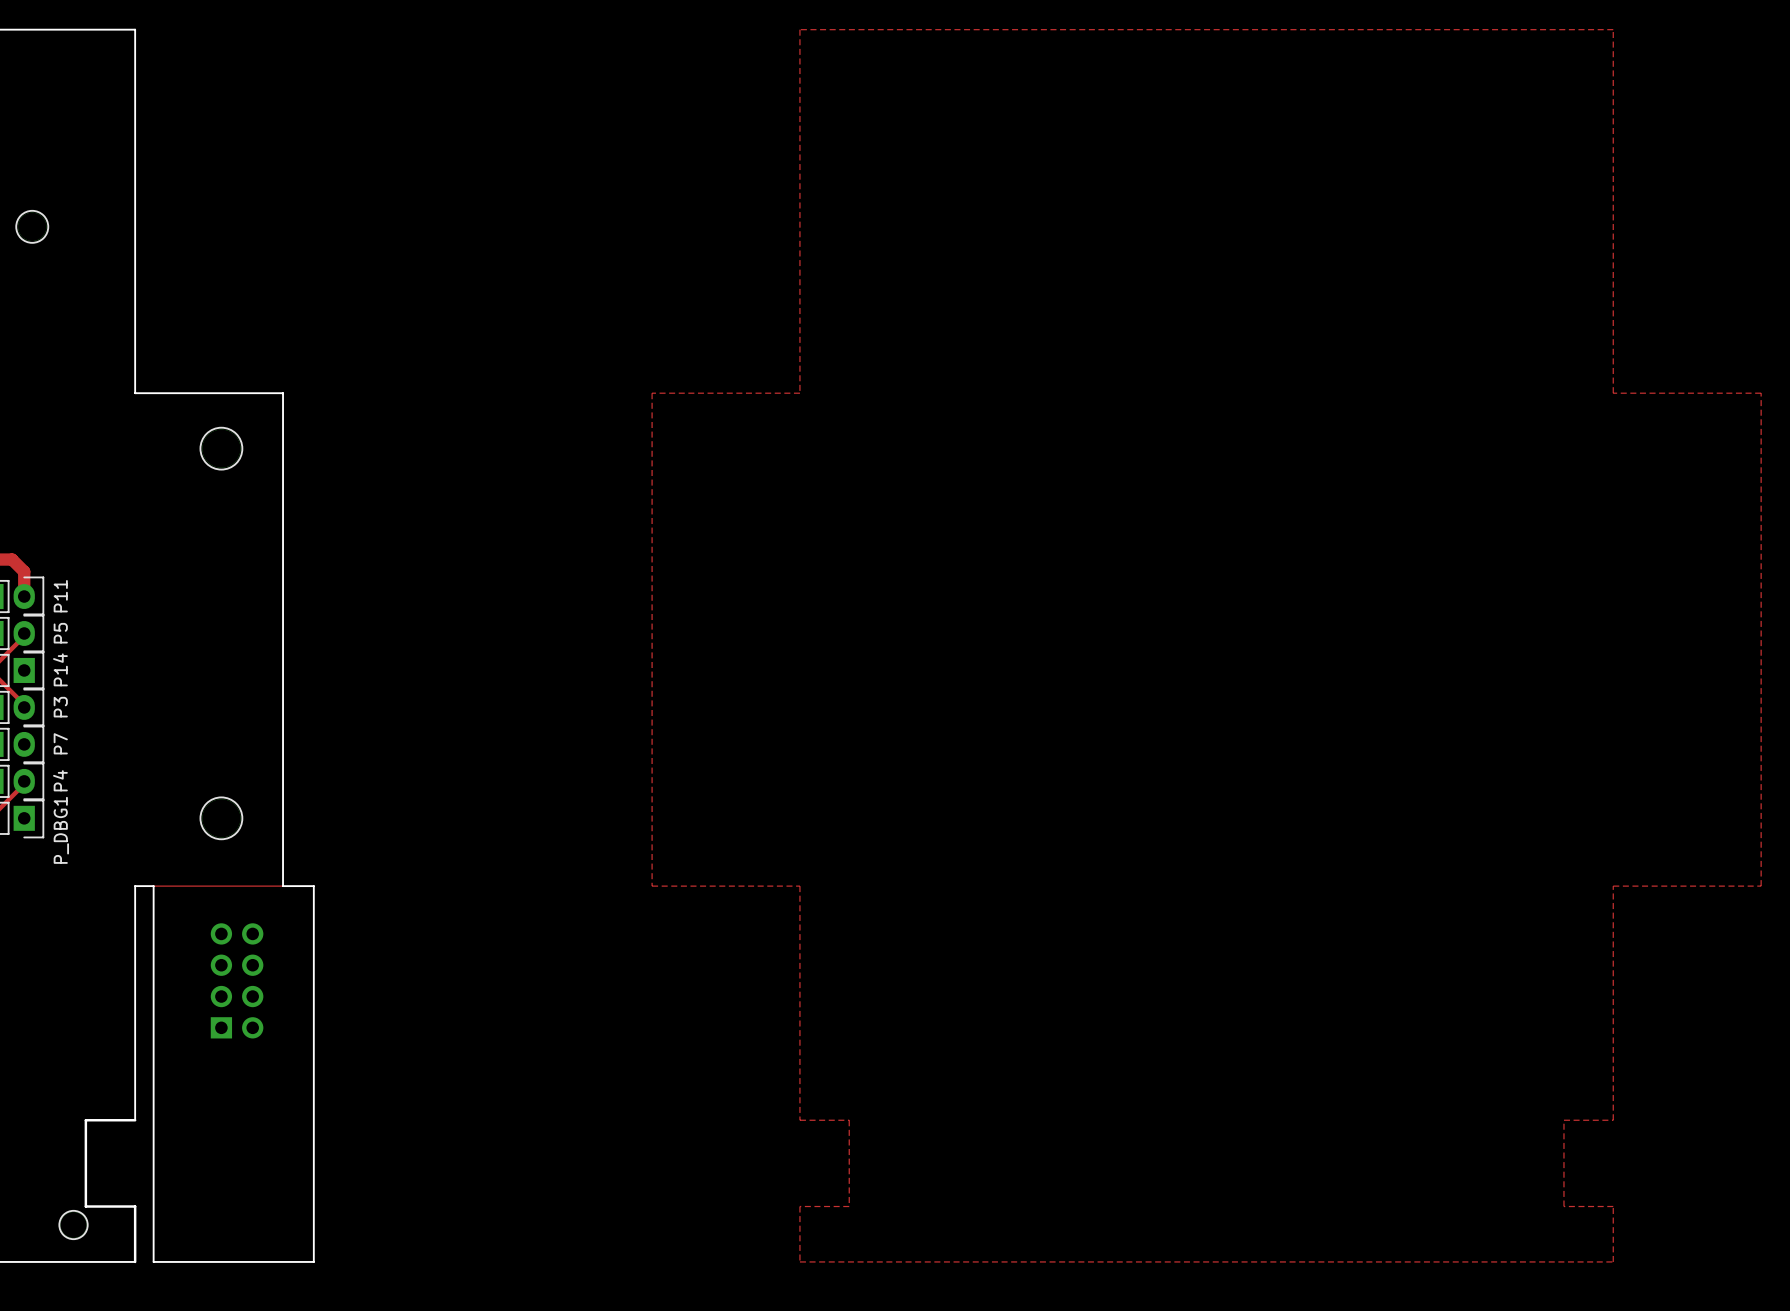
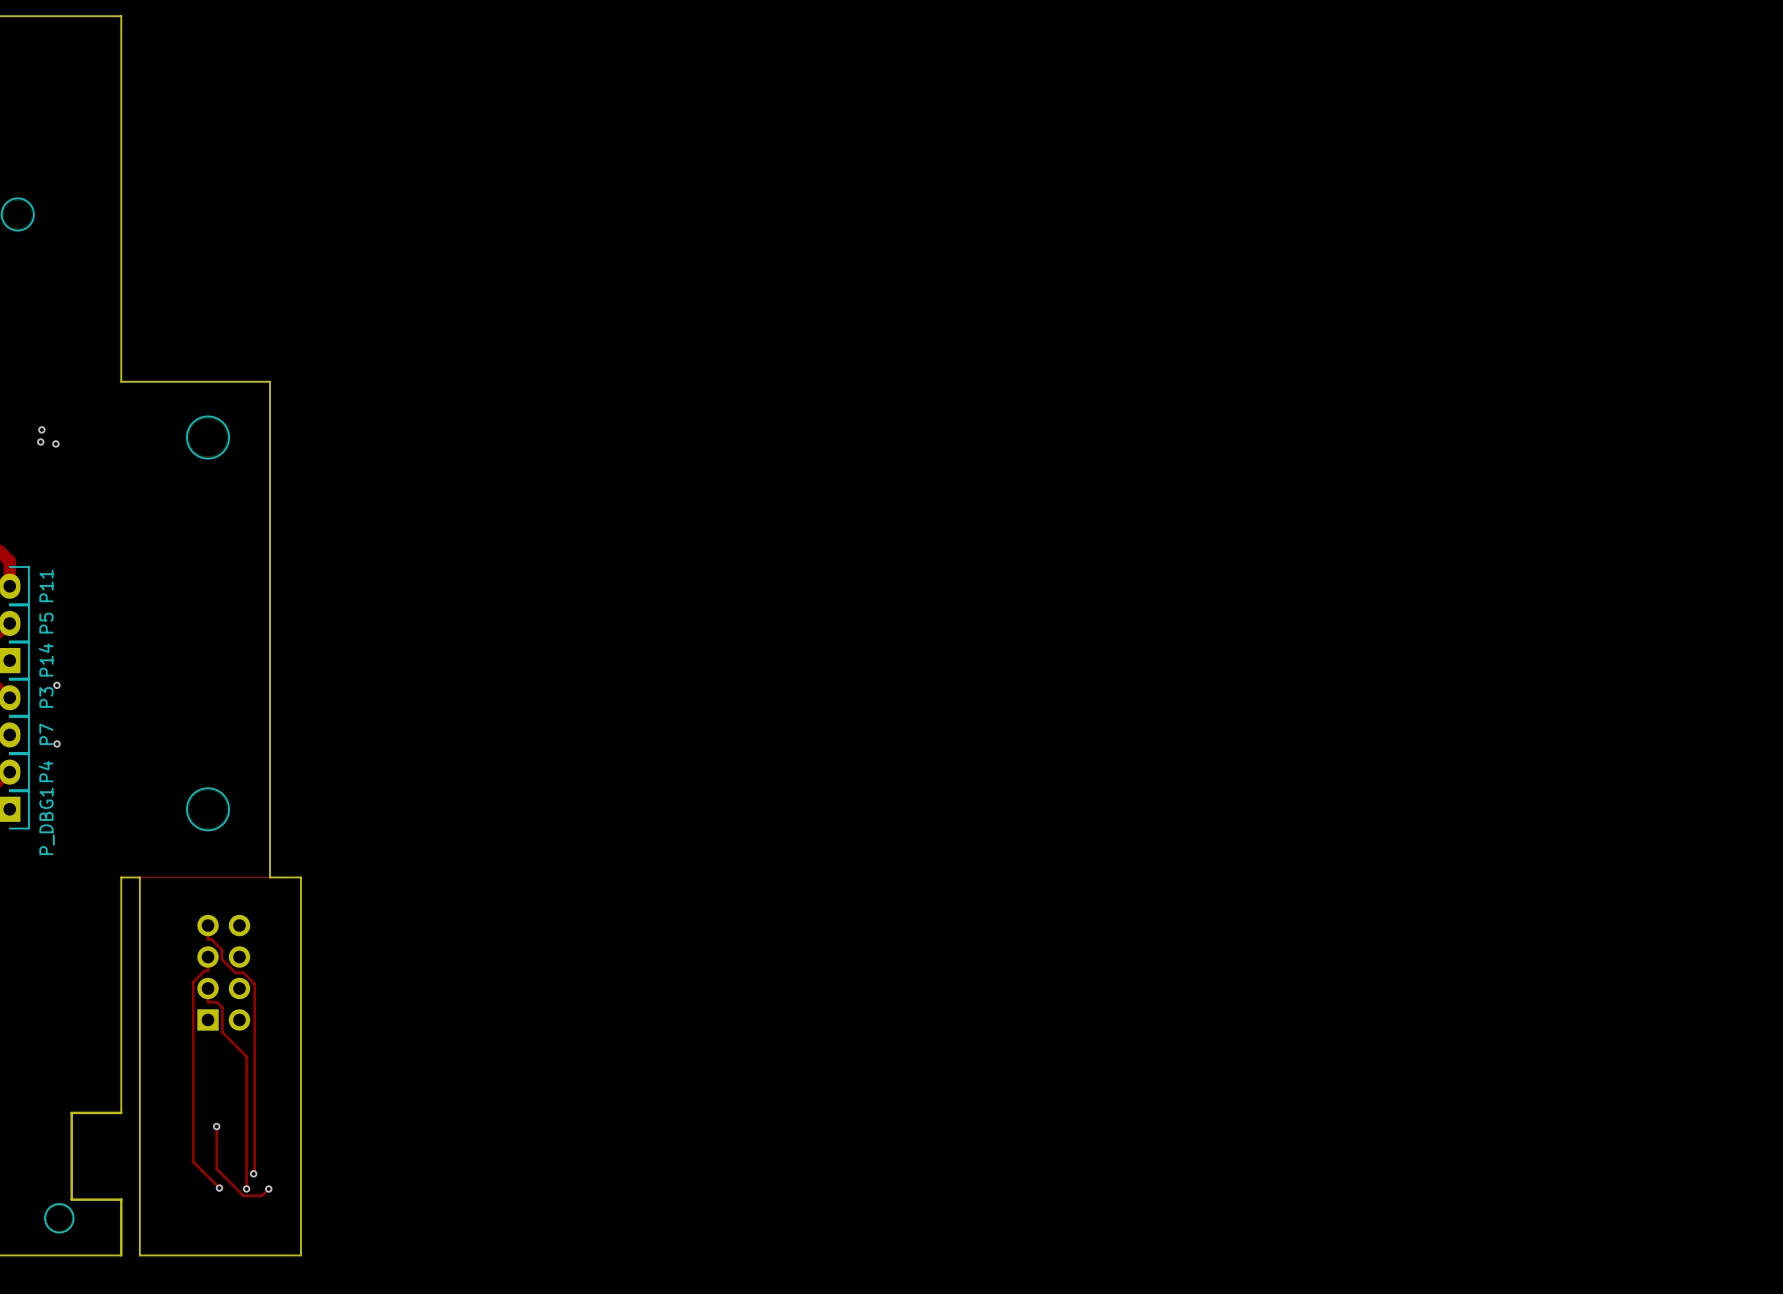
zone outline: (799, 29) (799, 393) (652, 393) (652, 886) (799, 886) (799, 1120) (849, 1120) (849, 1206) (799, 1206) (799, 1261) (1613, 1261) (1613, 1206) (1563, 1206) (1563, 1120) (1613, 1120) (1613, 886) (1761, 886) (1761, 393) (1613, 393) (1613, 29) (799, 29) -> none
via: none -> (41, 429)
via: none -> (40, 442)
via: none -> (55, 443)
via: none -> (56, 685)
via: none -> (57, 743)
track: none -> (208, 925) (208, 939) (211, 939) (221, 949) (221, 959) (235, 972) (243, 972) (254, 984) (253, 1173)
track: none -> (208, 957) (208, 970) (204, 970) (193, 982) (193, 1161) (219, 1188)
track: none -> (208, 988) (208, 1002) (217, 1002) (222, 1007) (222, 1032) (246, 1056) (246, 1188)
track: none -> (216, 1126) (216, 1168) (243, 1195) (261, 1195) (268, 1189)
via: none -> (216, 1126)
via: none -> (253, 1173)
via: none -> (219, 1188)
via: none -> (246, 1188)
via: none -> (268, 1189)

